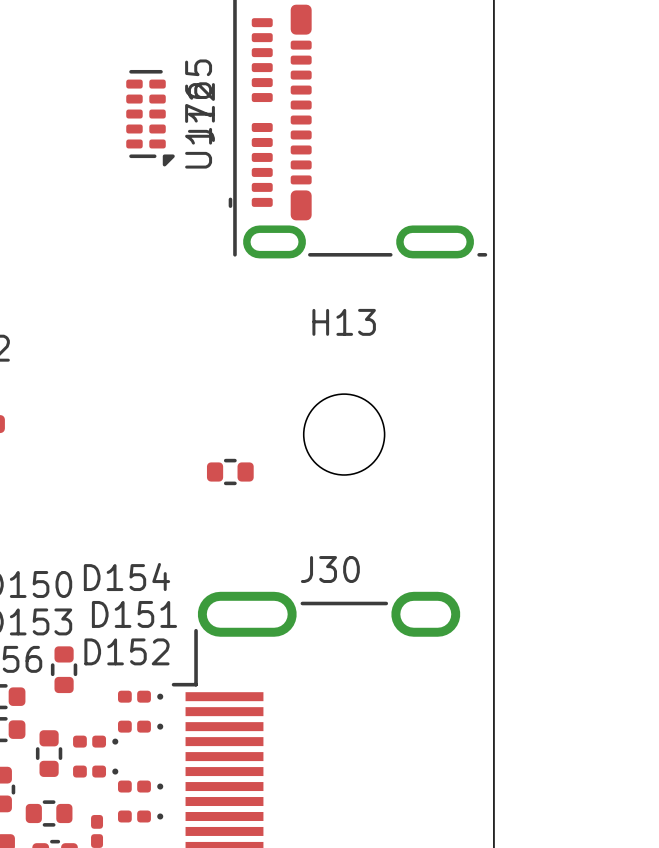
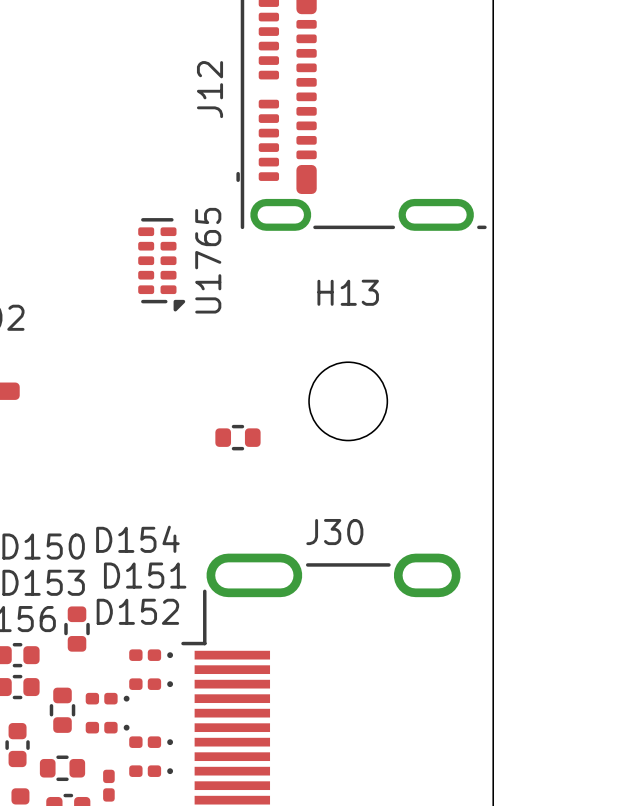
U1765 position: (150, 118) -> (161, 264)

